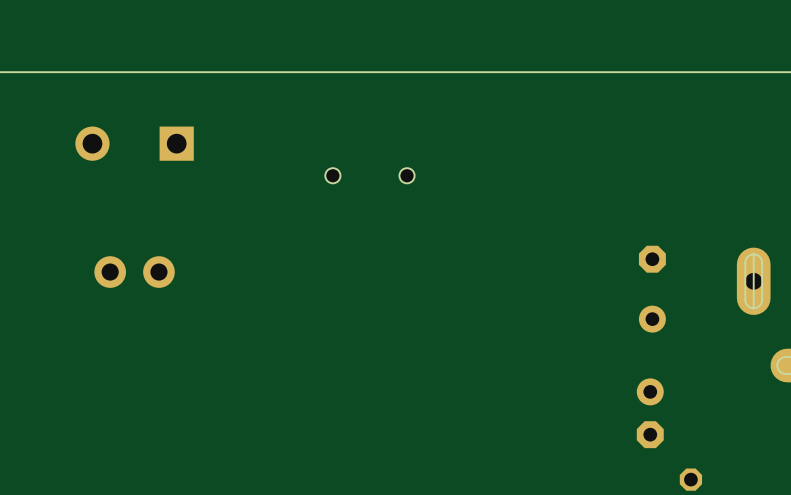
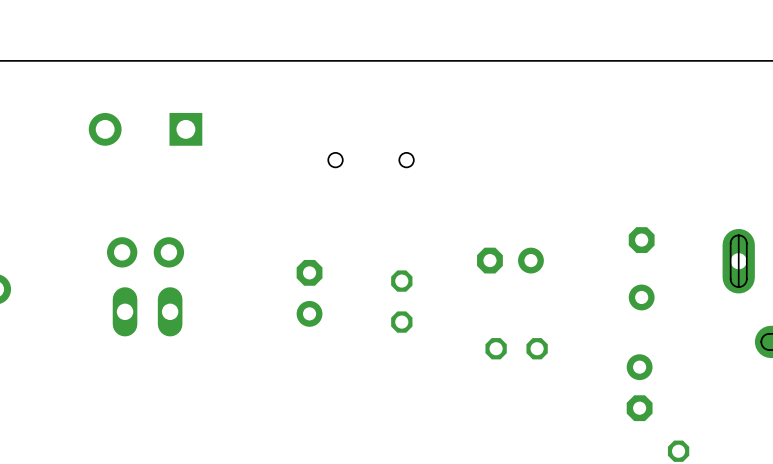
part: none -> (510, 260)
part: none -> (309, 293)
part: none -> (401, 301)
part: none -> (147, 311)
part: none -> (516, 348)

